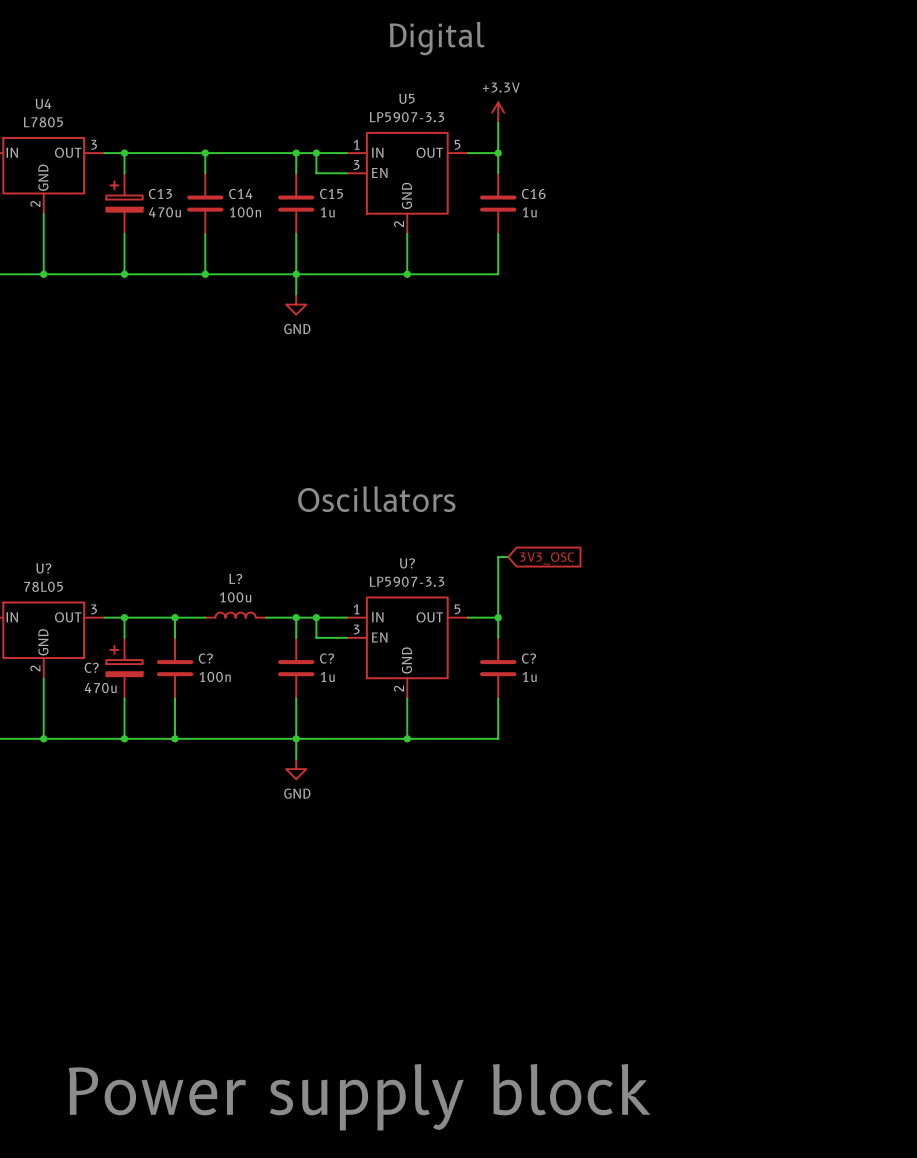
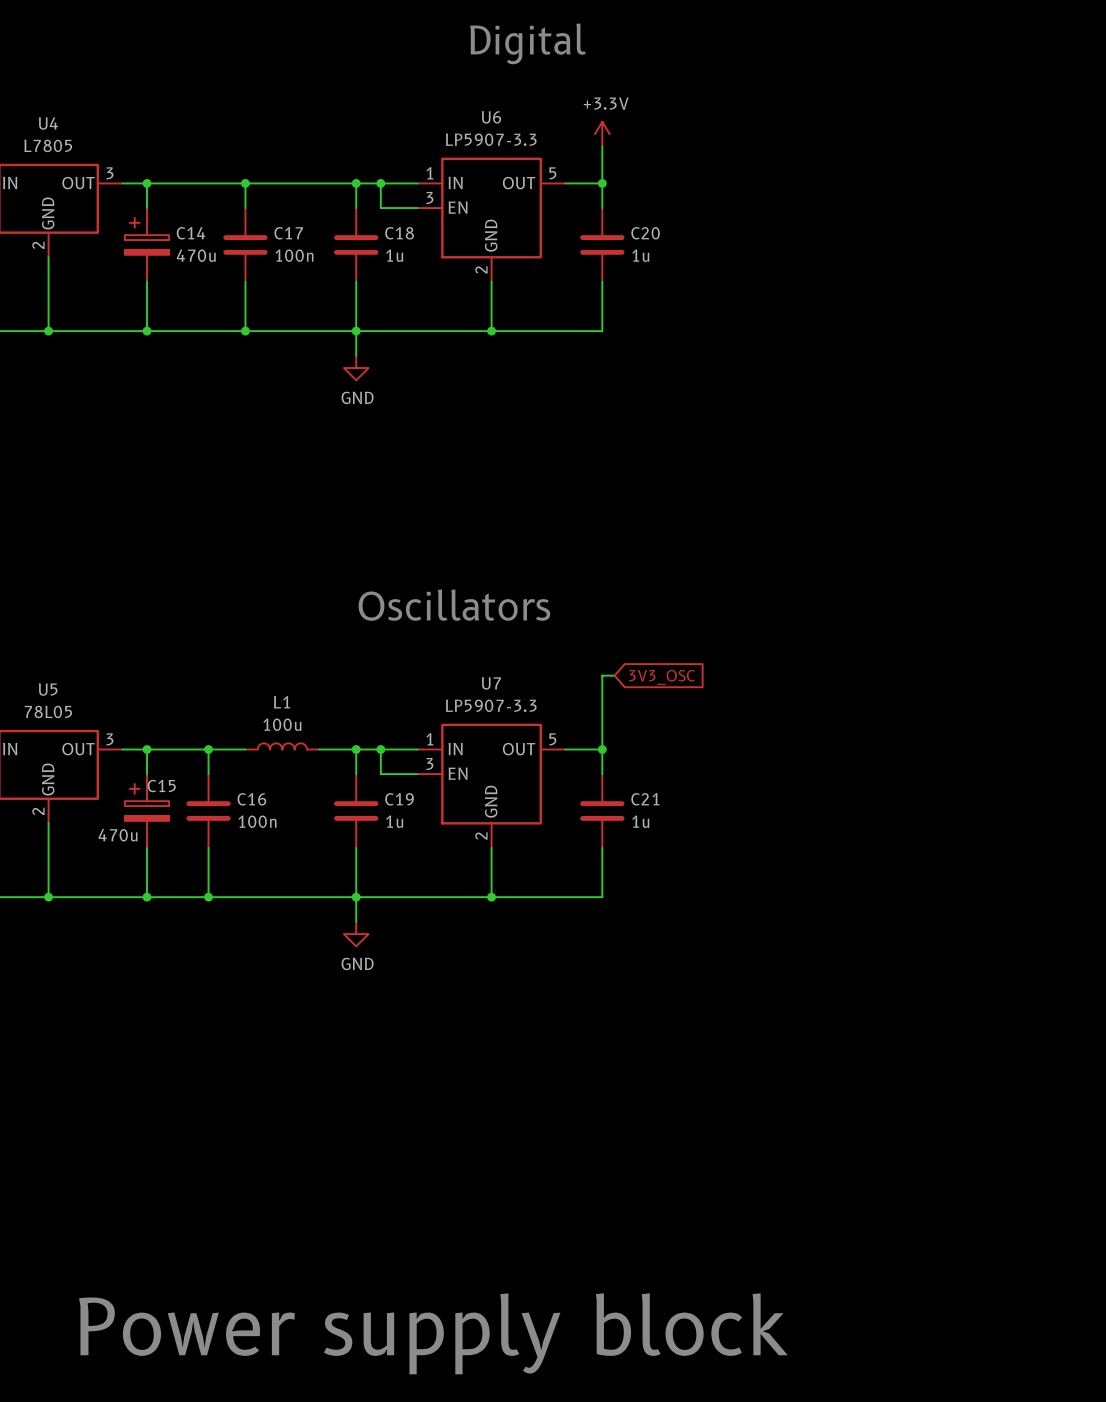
U5 name: U5 (406, 98) -> U6 (491, 117)
C13 name: C13 (160, 193) -> C14 (190, 233)
C14 name: C14 (240, 193) -> C17 (288, 233)
C15 name: C15 (331, 193) -> C18 (399, 233)
C16 name: C16 (533, 193) -> C20 (645, 233)
U? name: U? (407, 563) -> U7 (491, 683)
U? name: U? (43, 568) -> U5 (48, 689)
L? name: L? (235, 578) -> L1 (282, 702)
C? name: C? (205, 658) -> C16 (251, 799)
C? name: C? (327, 658) -> C19 (399, 799)
C? name: C? (529, 658) -> C21 (645, 799)
C? name: C? (91, 667) -> C15 (161, 786)

